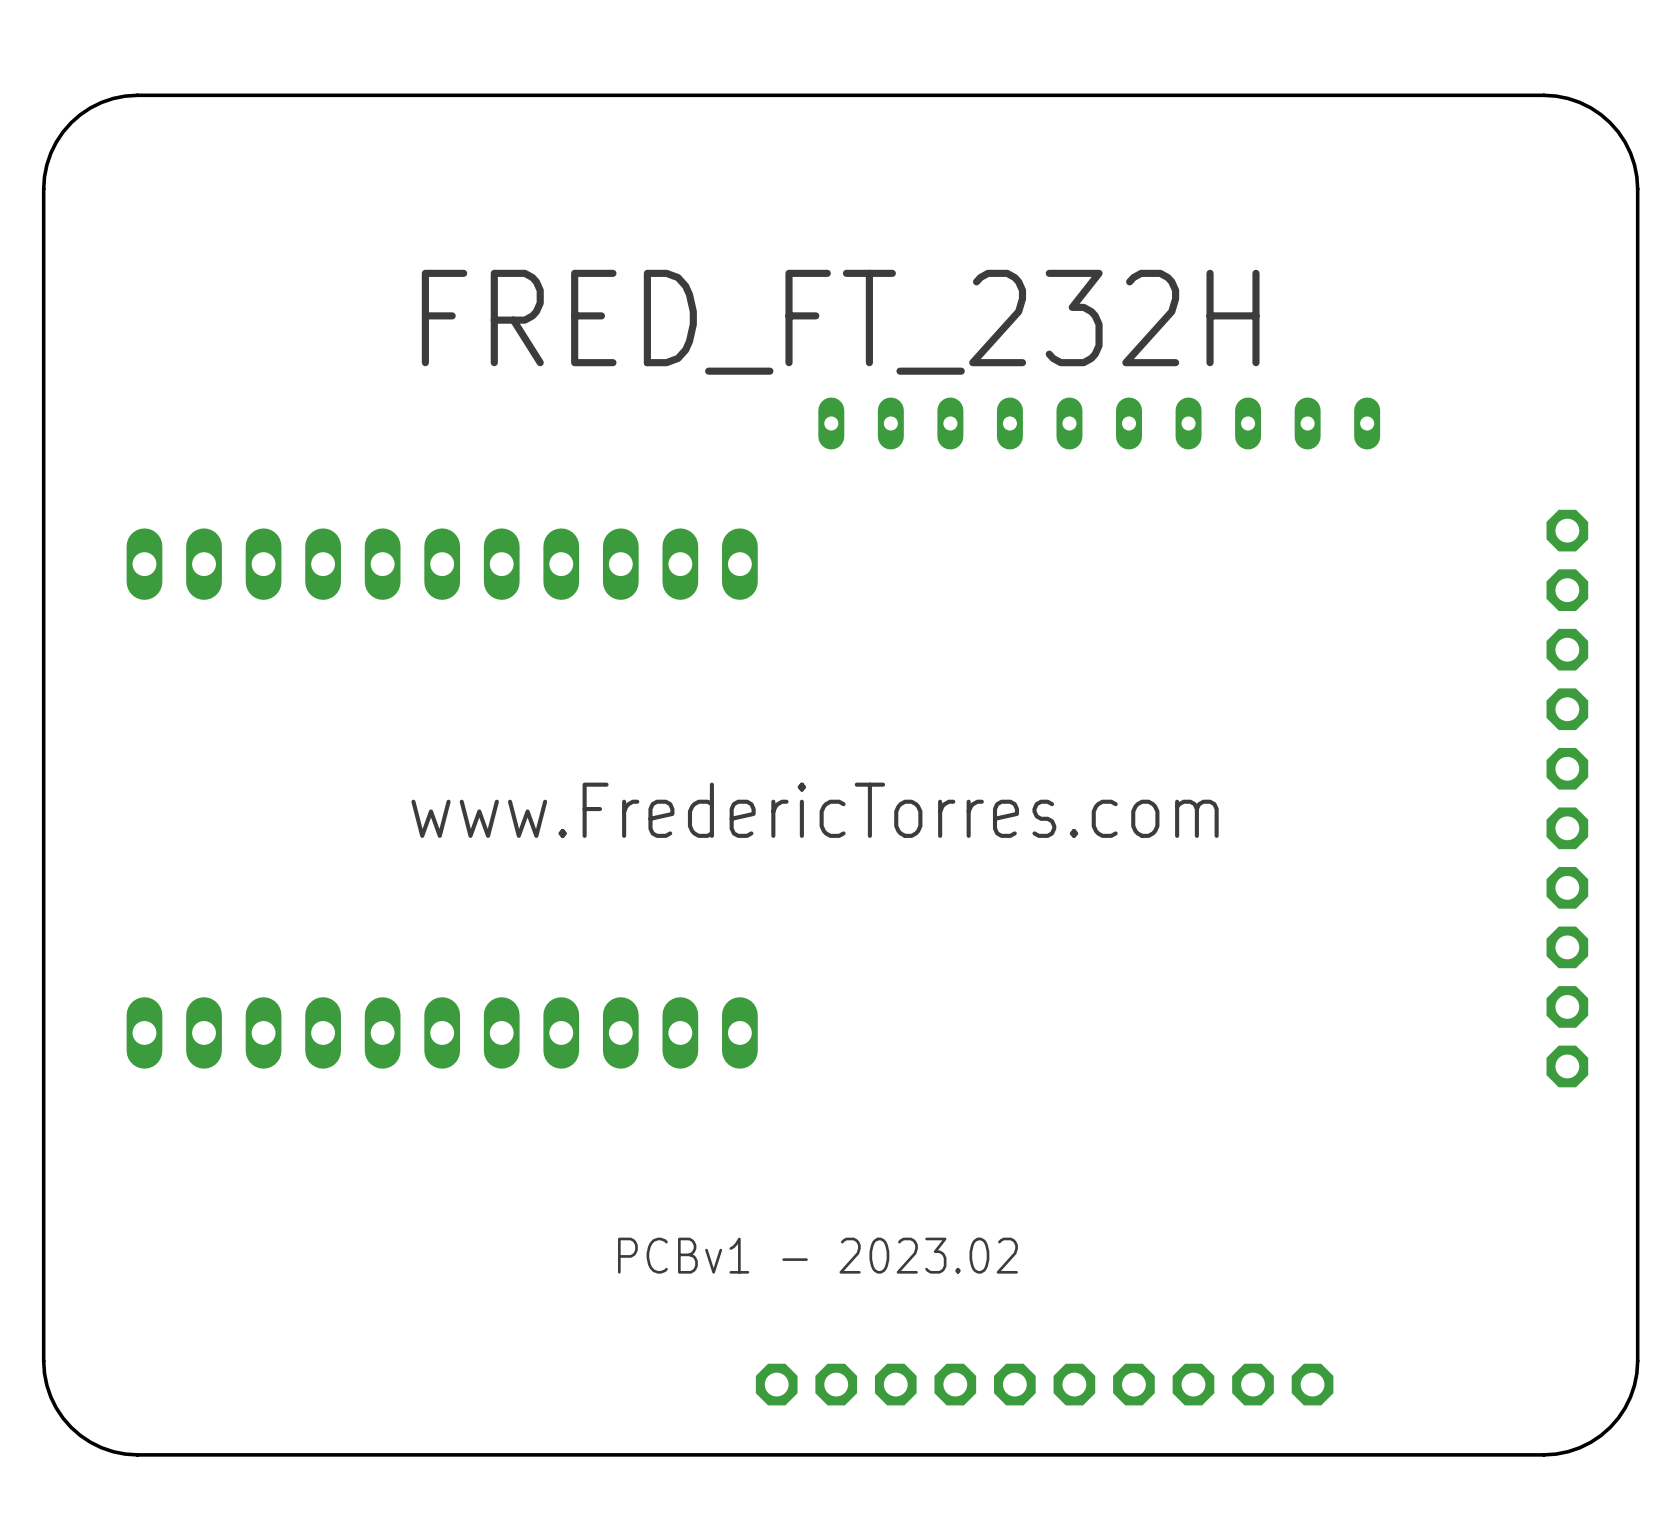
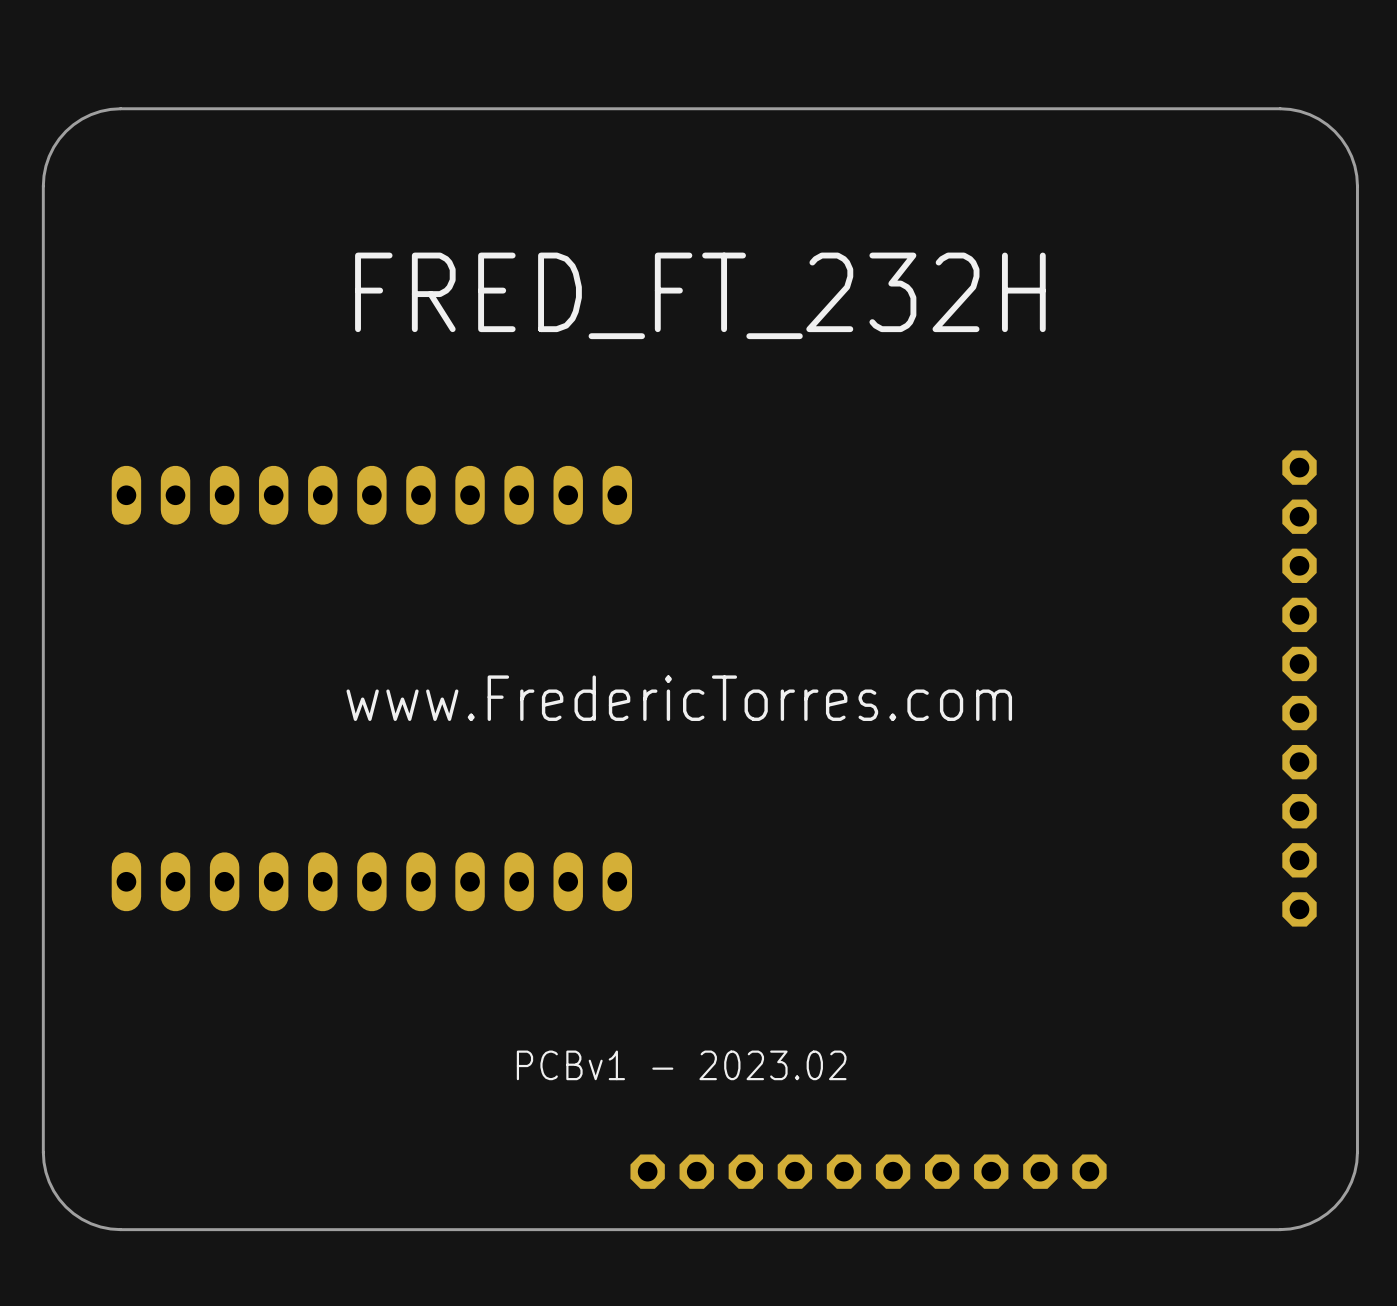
part: (1099, 423) -> none

